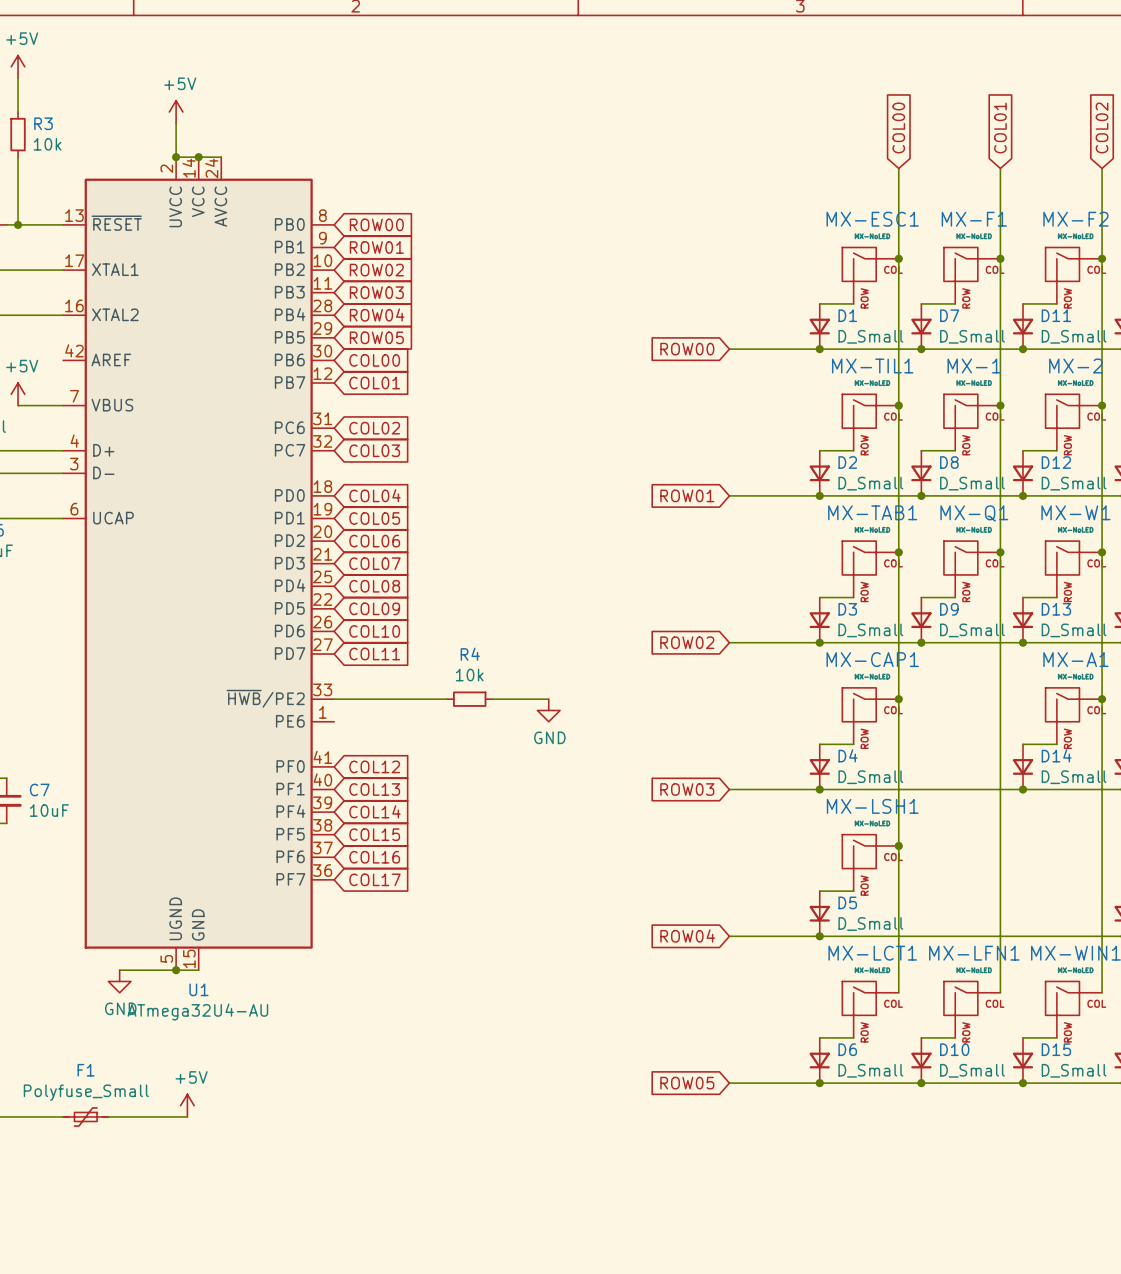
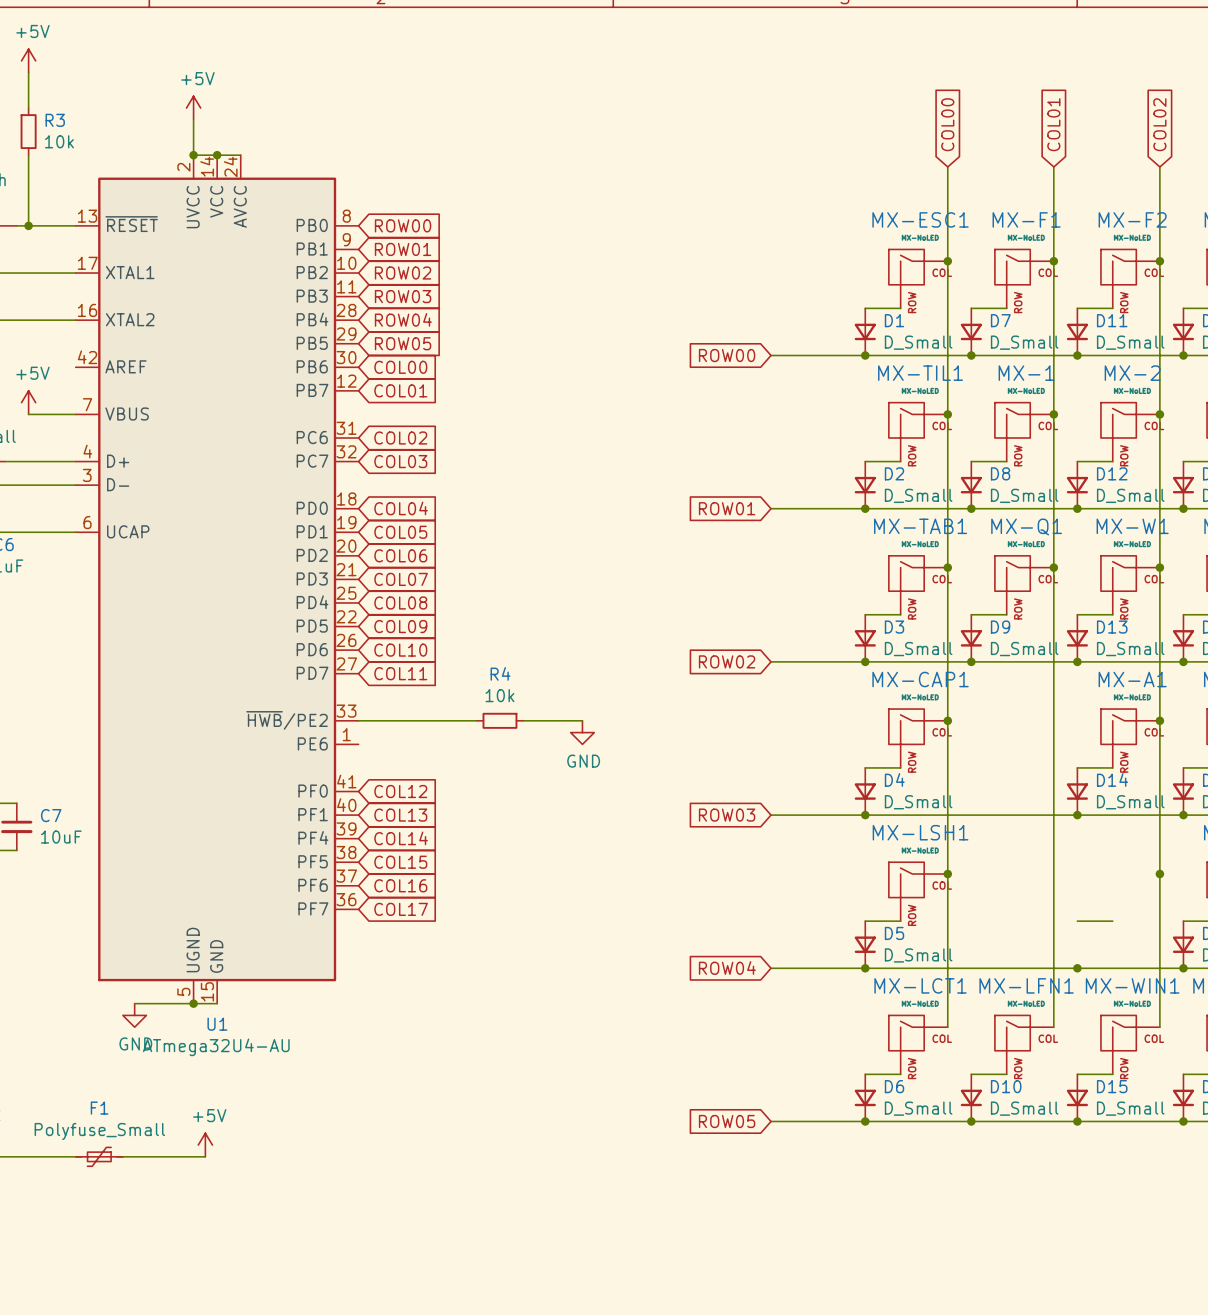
junction: none -> (1159, 874)
wire: none -> (1077, 921) (1112, 921)
junction: none -> (1077, 968)

